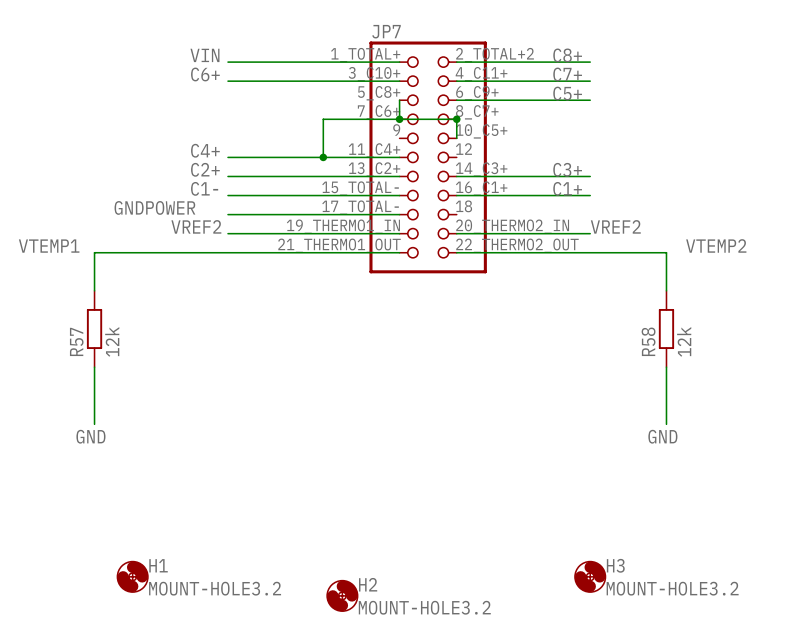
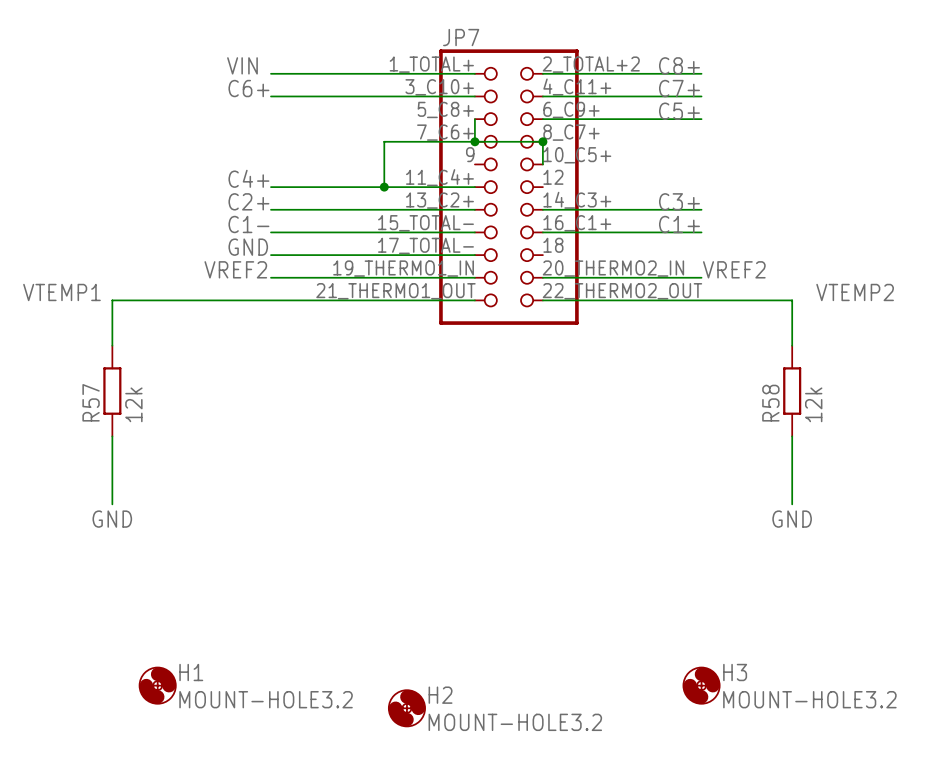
label: GNDPOWER (154, 207) -> none
label: none -> GND (248, 247)

